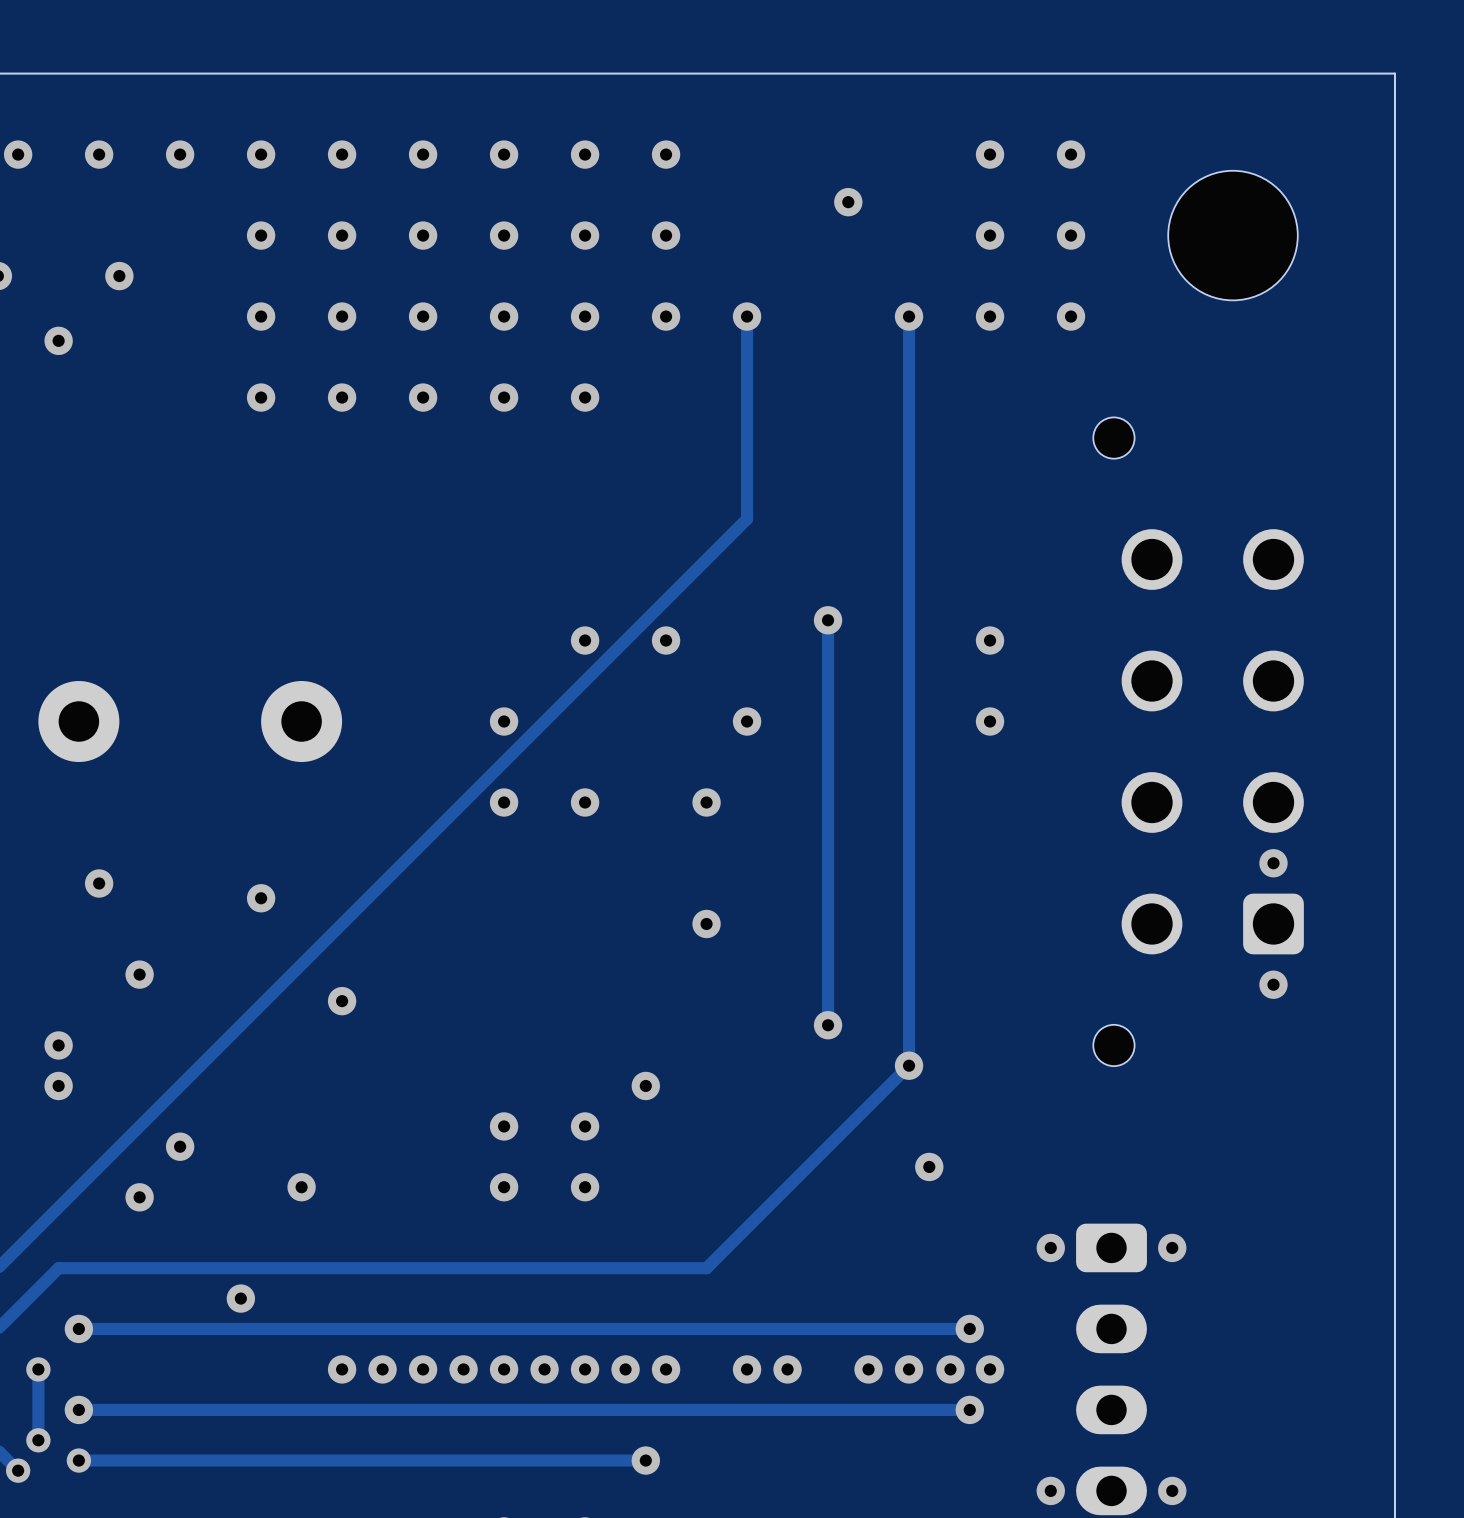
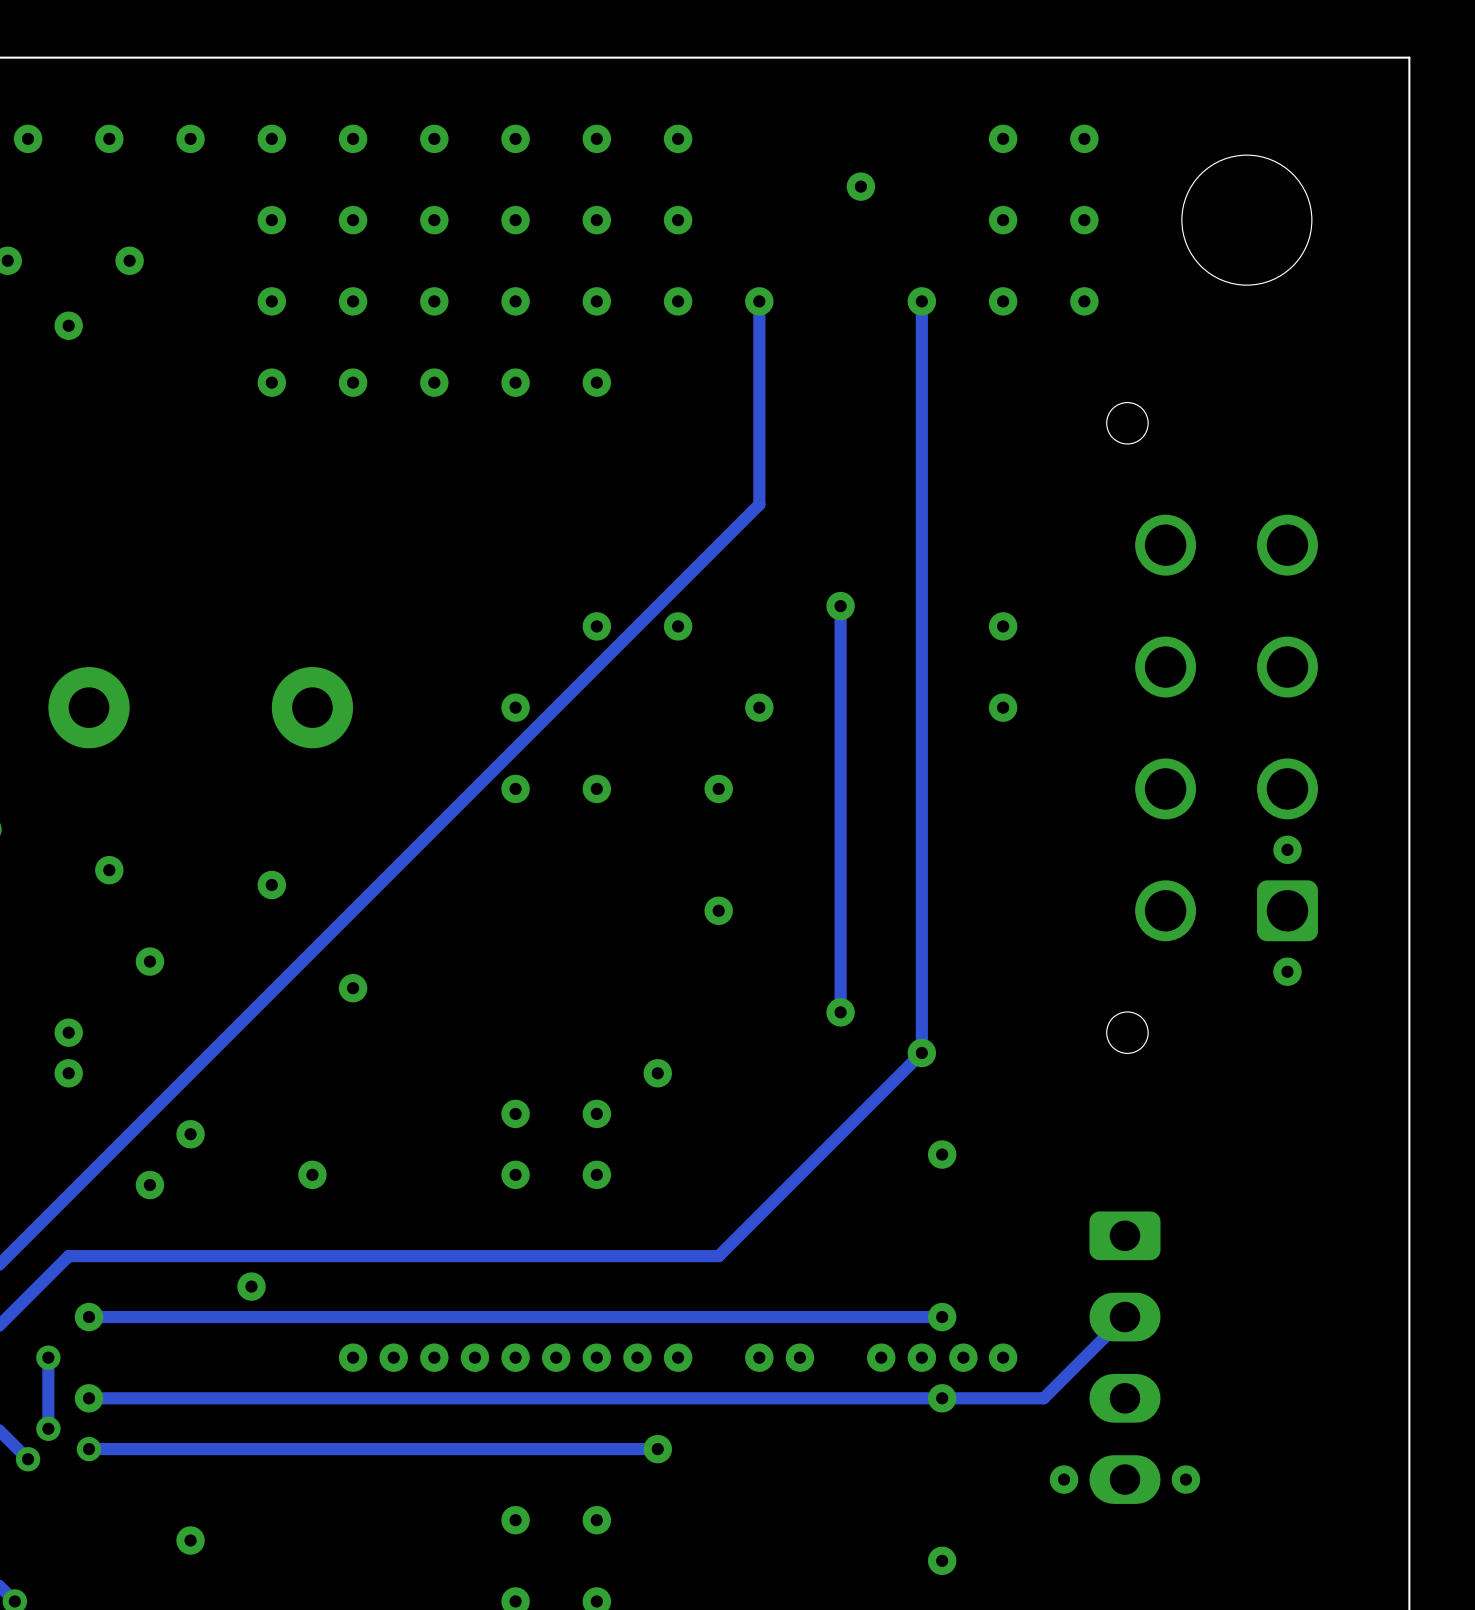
via: (1050, 1247) -> none
via: (1172, 1247) -> none
track: (969, 1328) (929, 1328) -> none
via position: (969, 1328) -> (942, 1317)
track: none -> (1124, 1317) (1043, 1398) (982, 1398)
via position: (969, 1409) -> (942, 1398)

